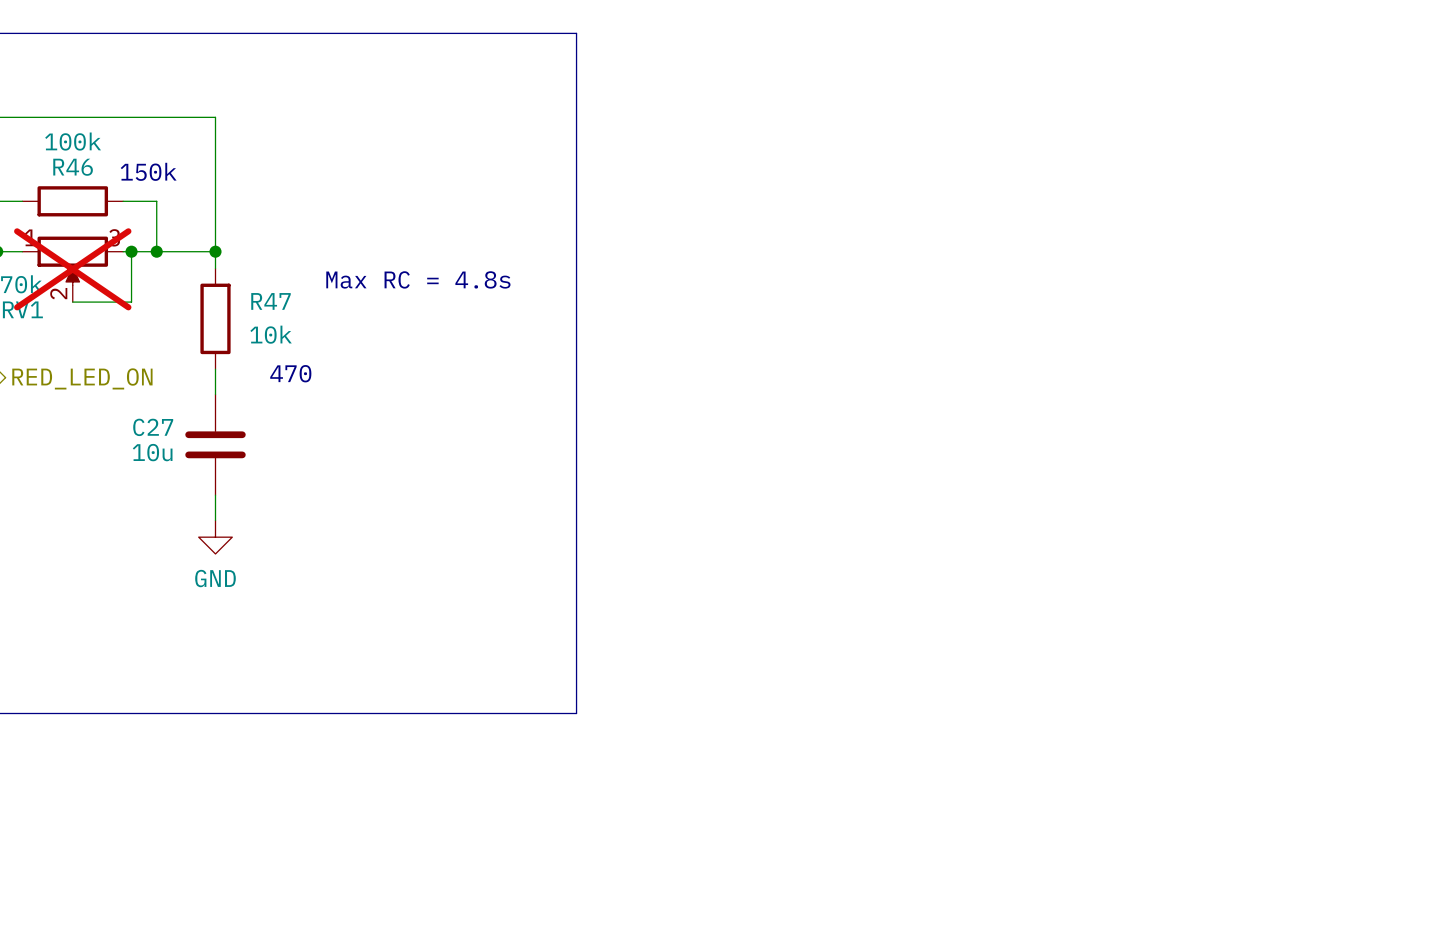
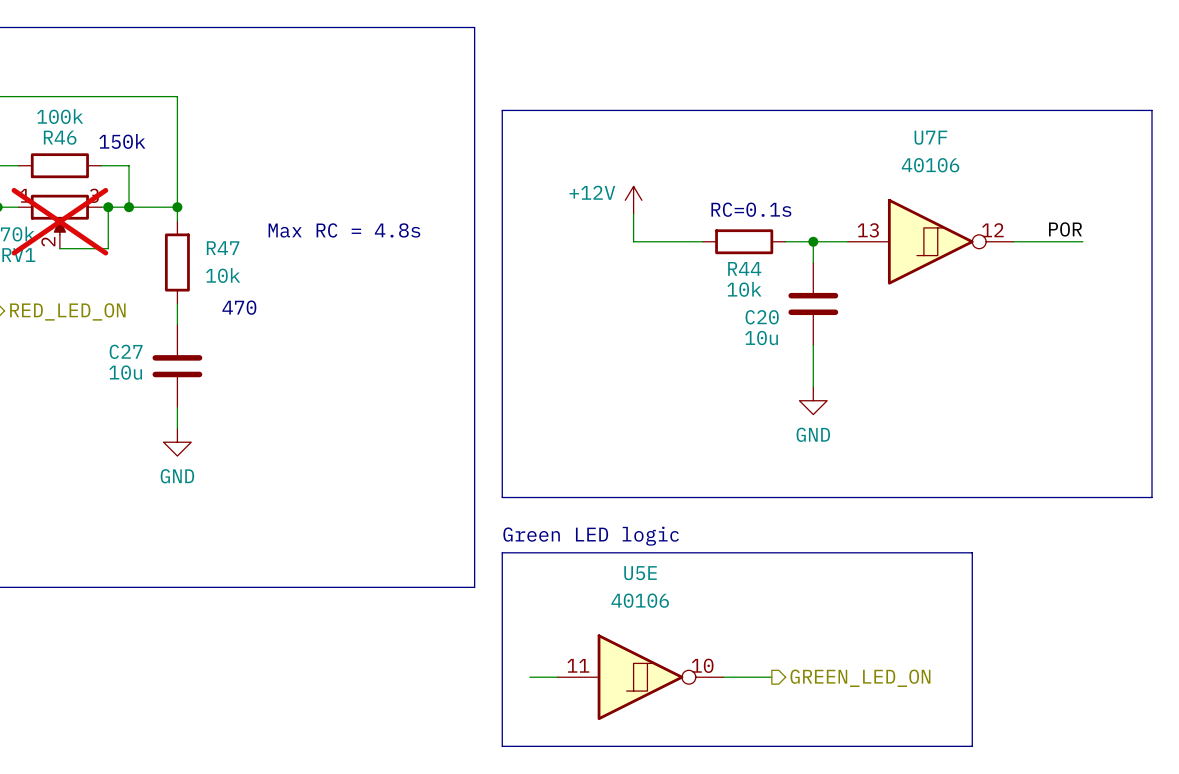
line: none -> (502, 110) (1152, 110) (1152, 497) (502, 497) (502, 110)
power symbol: none -> +12V (633, 200)
text: none -> RC=0.1s (751, 209)
wire: none -> (633, 214) (633, 241) (702, 241)
label: none -> POR (1065, 229)
R44: none -> 10k (744, 241)
wire: none -> (785, 241) (847, 241)
wire: none -> (813, 241) (813, 262)
junction: none -> (813, 241)
U7F: none -> 40106 (930, 241)
wire: none -> (1013, 241) (1082, 241)
C20: none -> 10u (813, 303)
wire: none -> (813, 345) (813, 386)
power symbol: none -> GND (813, 400)
text: none -> Green LED logic (591, 536)
line: none -> (502, 552) (502, 746) (972, 746) (972, 552) (502, 552)
wire: none -> (529, 677) (557, 677)
U5E: none -> 40106 (640, 677)
wire: none -> (723, 677) (771, 677)
hierarchical label: none -> GREEN_LED_ON (860, 678)

